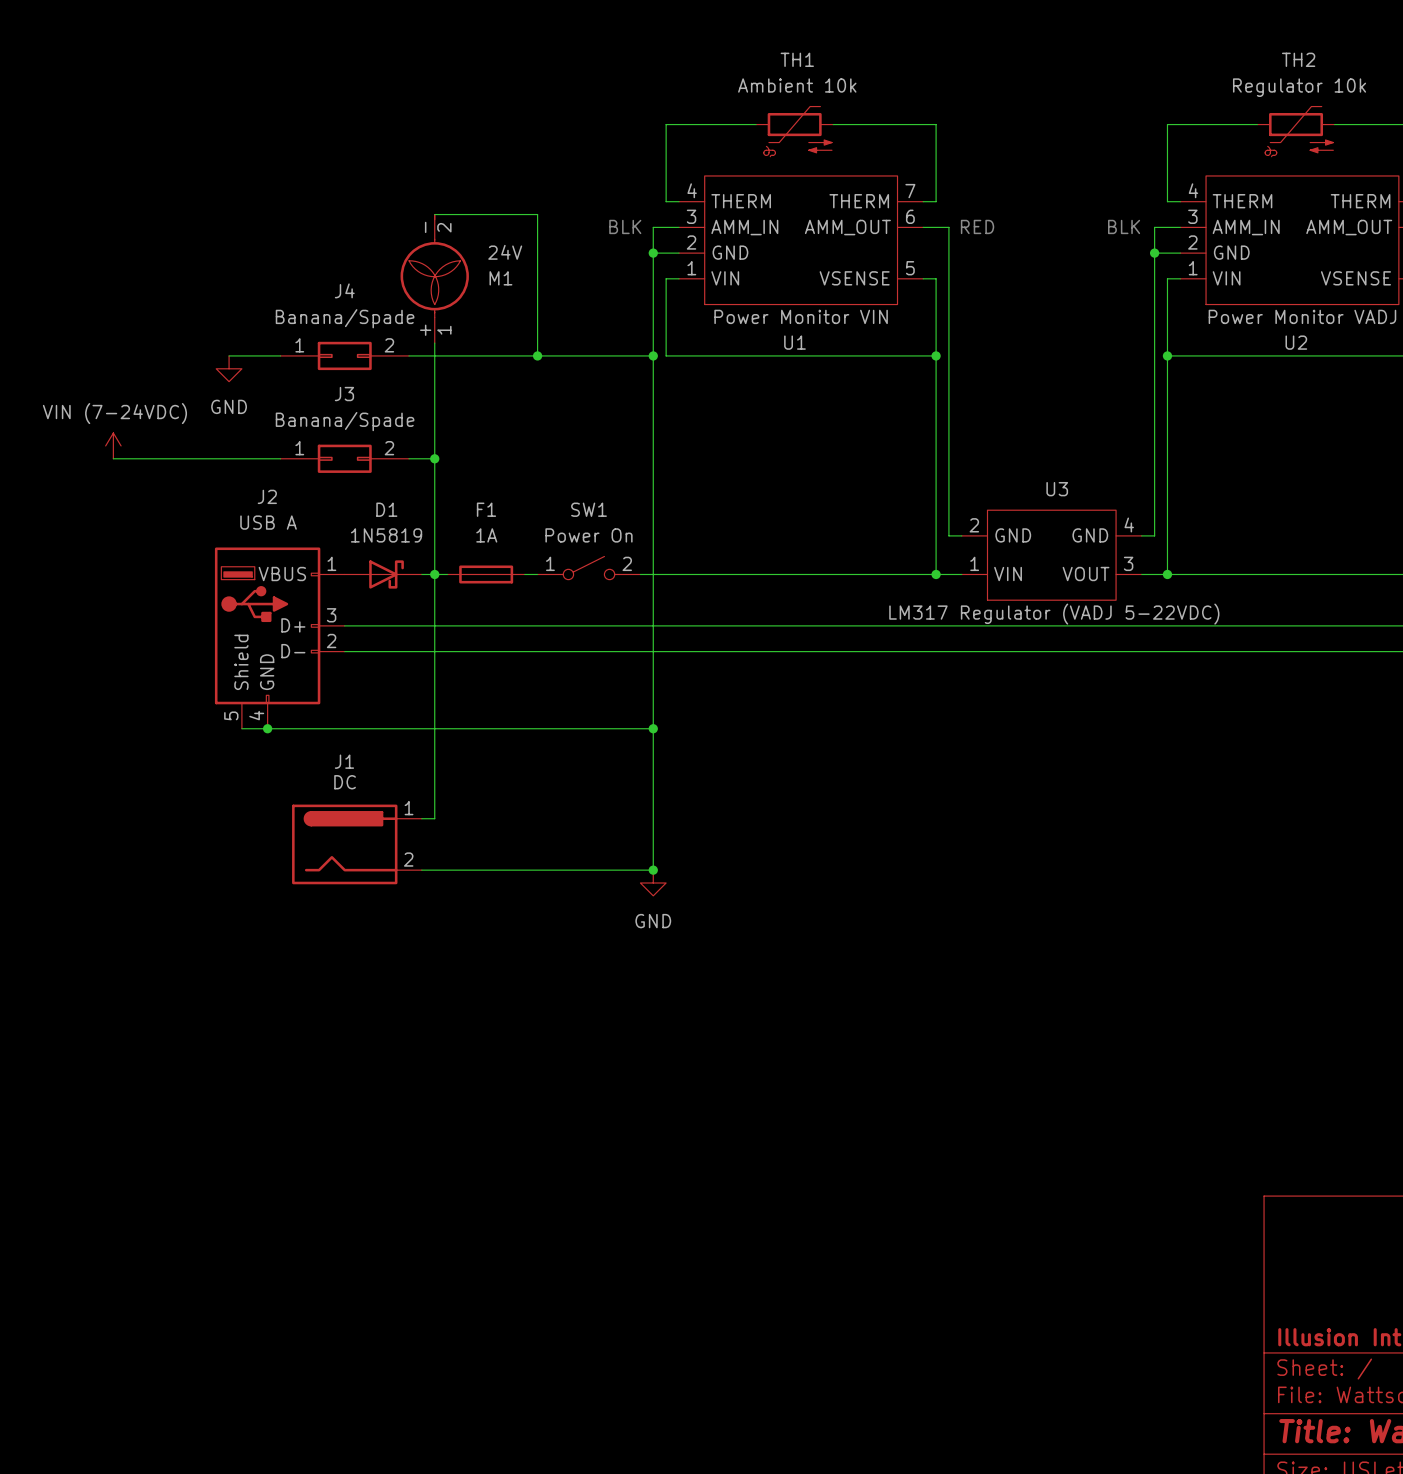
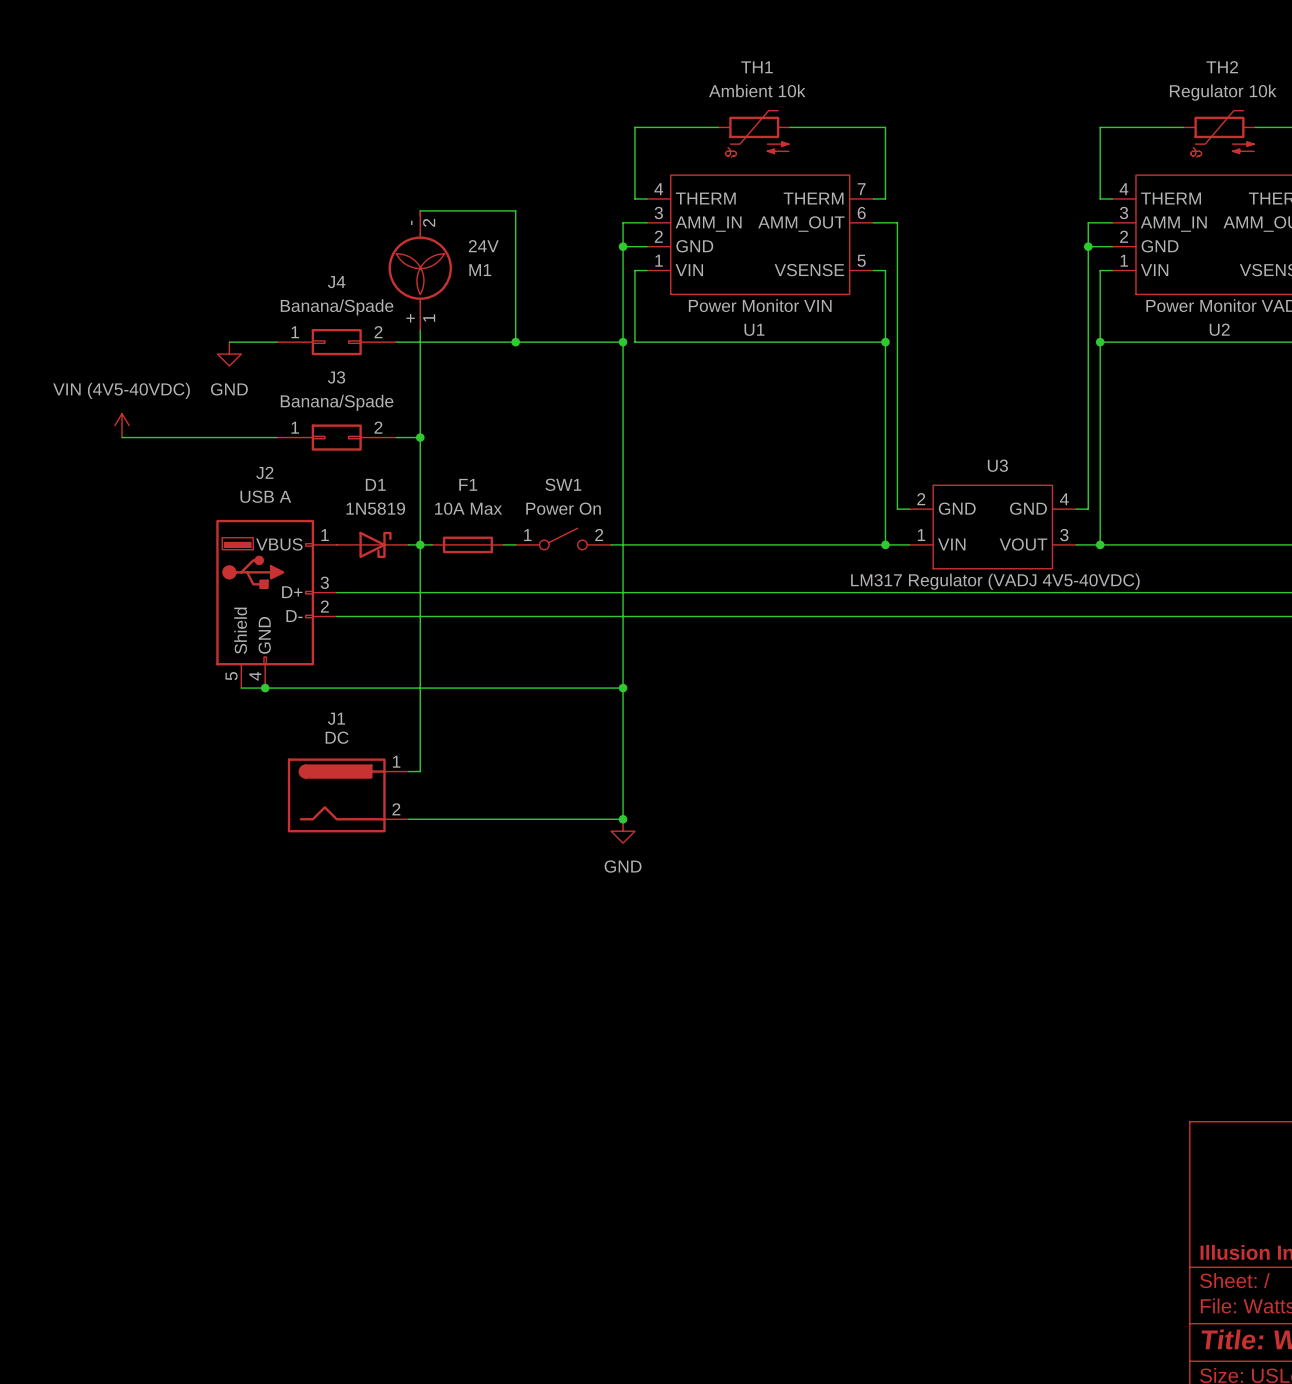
text: BLK (625, 226) -> none
text: RED (977, 226) -> none
text: BLK (1124, 226) -> none
power symbol: VIN (7-24VDC) (113, 445) -> VIN (4V5-40VDC) (122, 425)
F1 value: 1A (486, 535) -> 10A Max (468, 508)
U3 value: LM317 Regulator (VADJ 5-22VDC) (1054, 614) -> LM317 Regulator (VADJ 4V5-40VDC) (995, 581)

